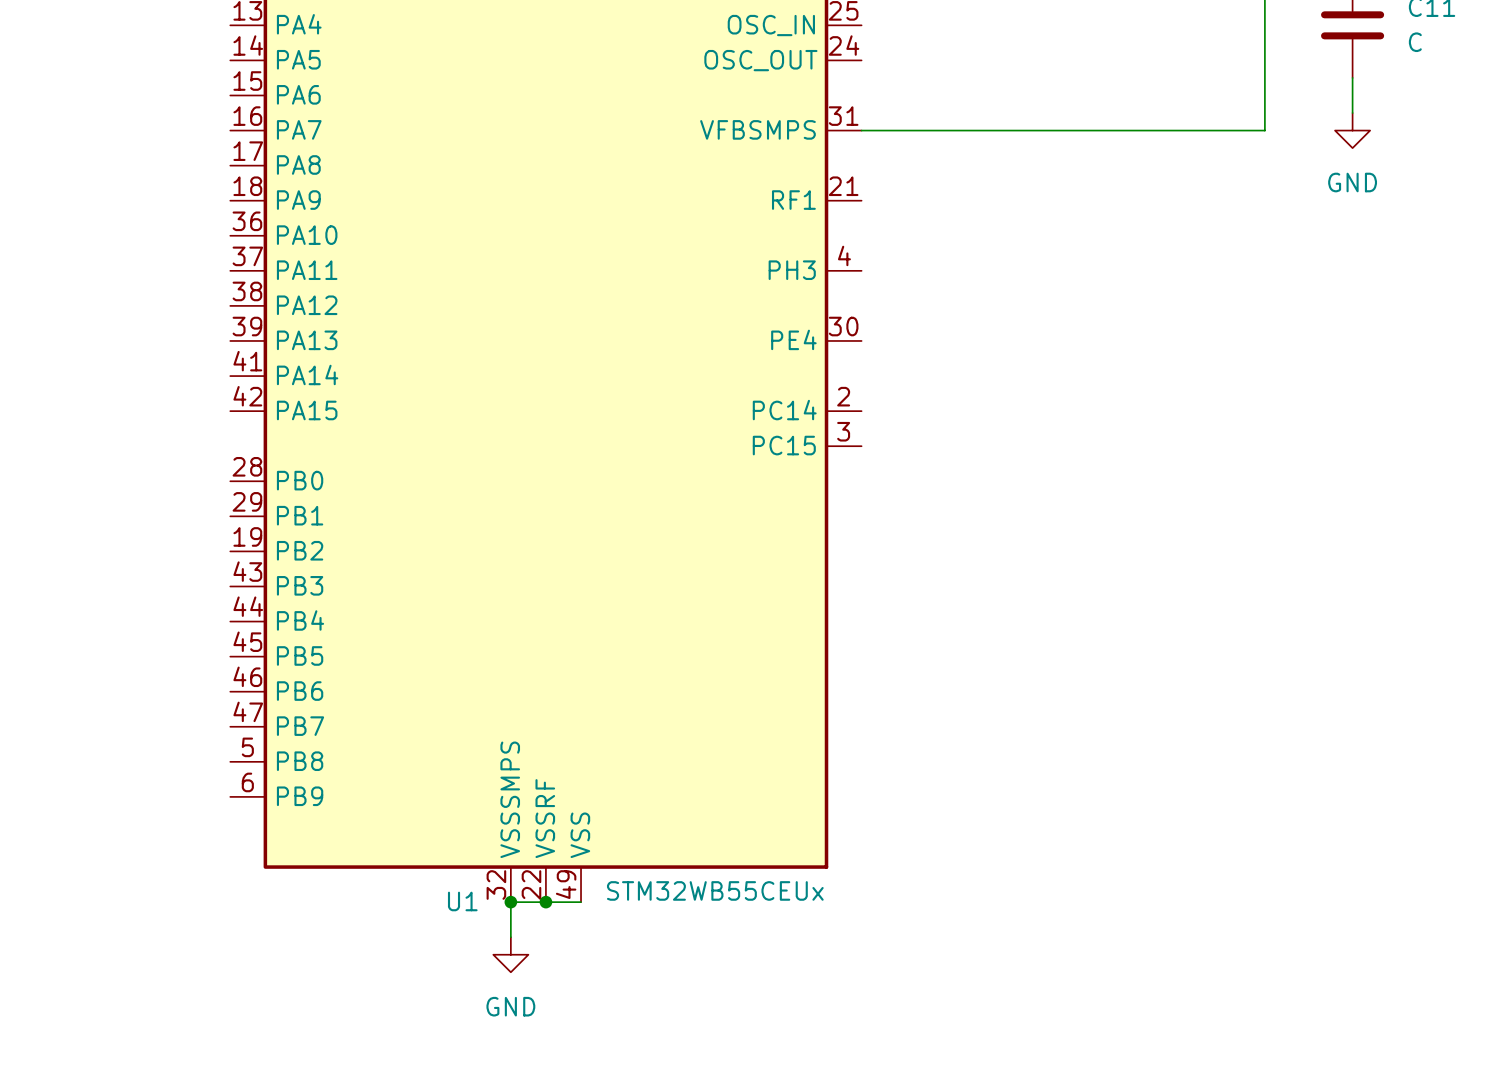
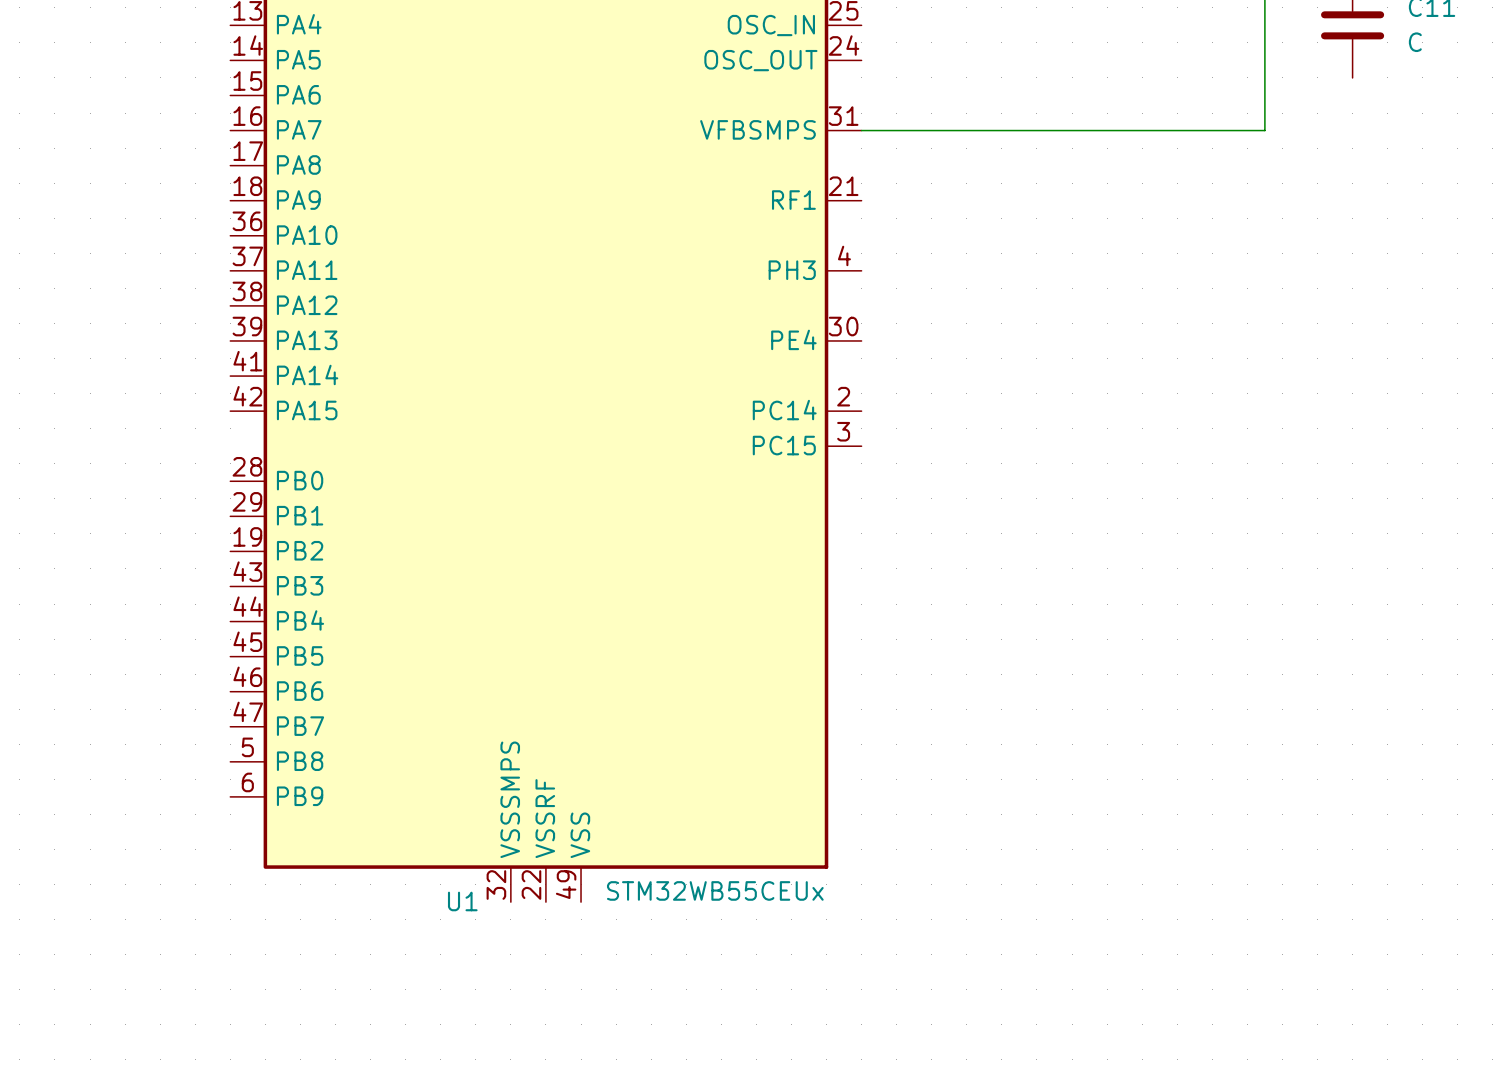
wire: (1352, 77) (1352, 113) -> none
power symbol: GND (1352, 130) -> none
junction: (510, 902) -> none
junction: (545, 902) -> none
wire: (581, 902) (510, 902) (510, 937) -> none
power symbol: GND (510, 954) -> none

